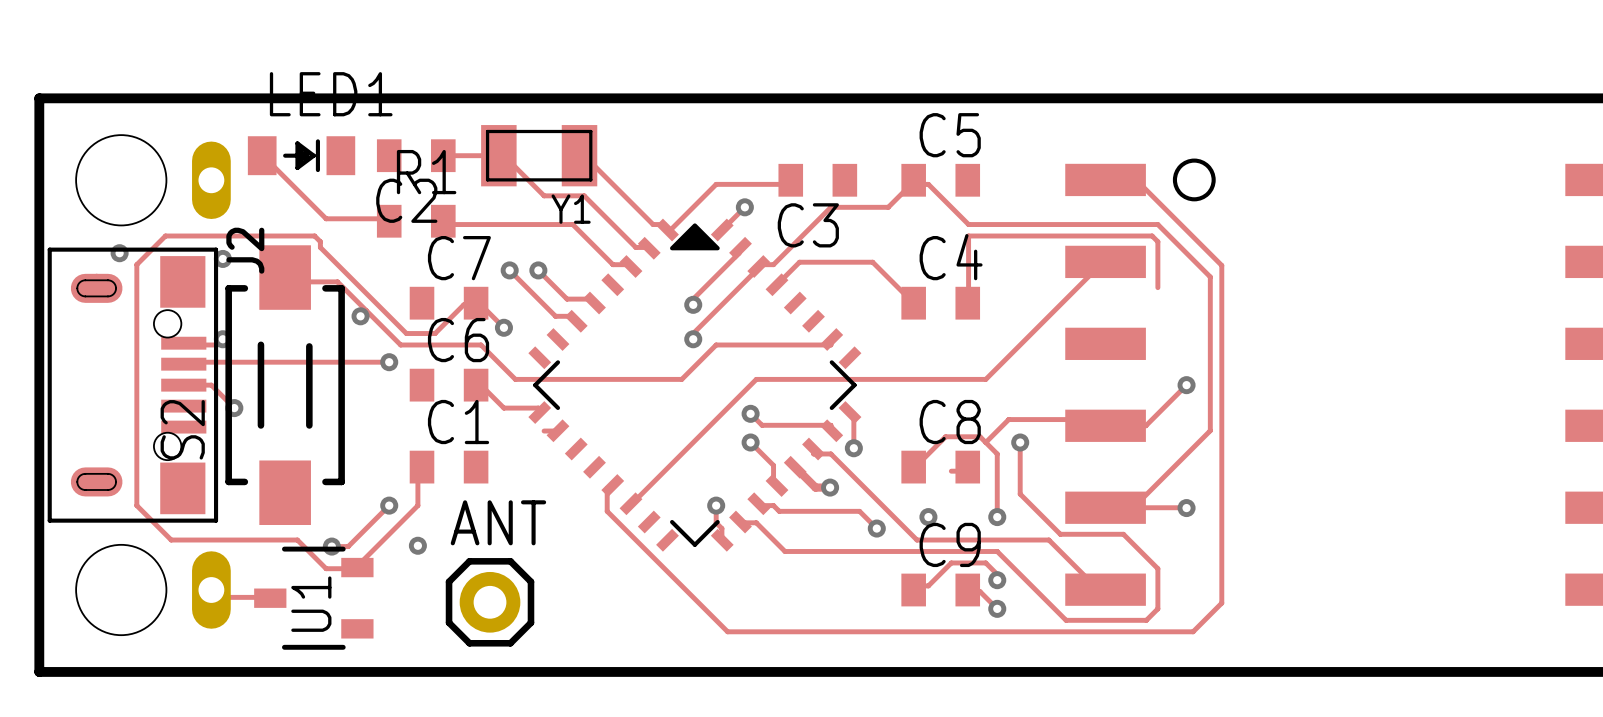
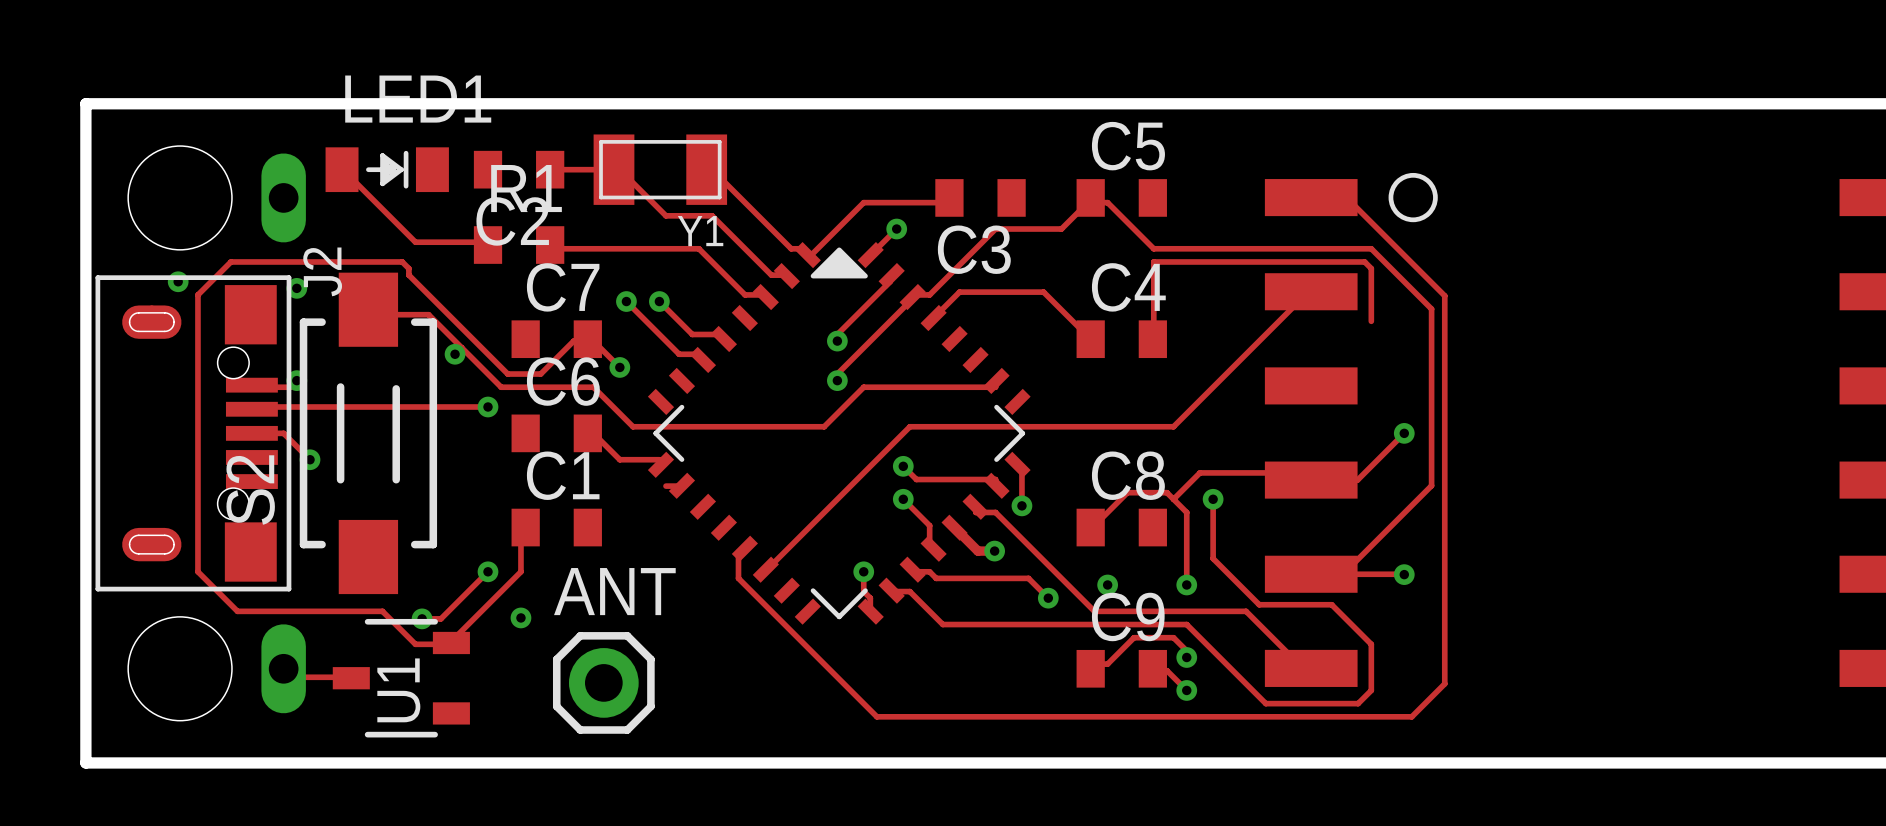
track: (951, 471) (962, 471) -> none

